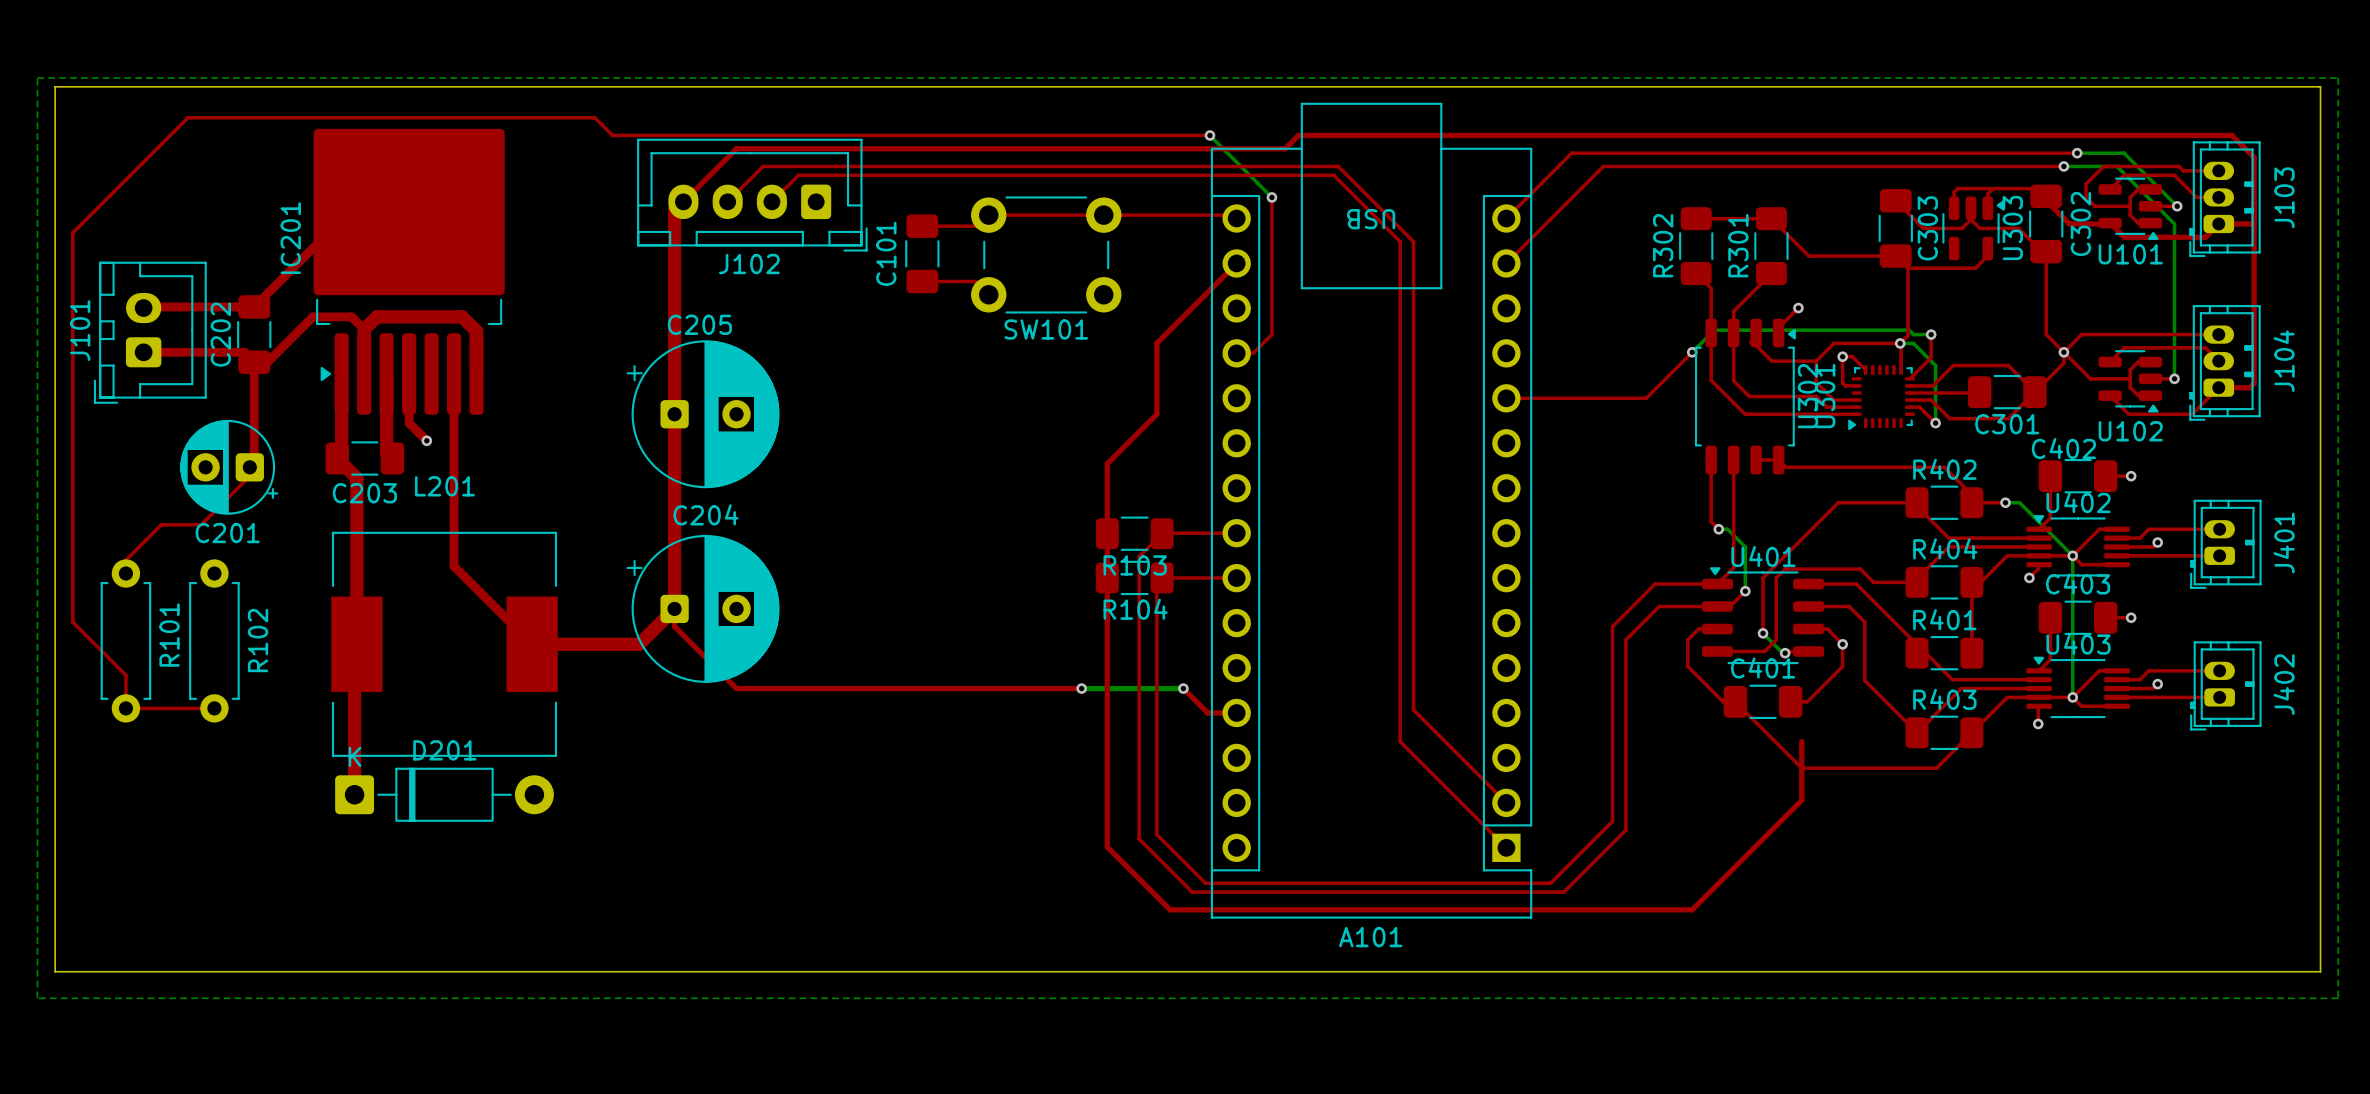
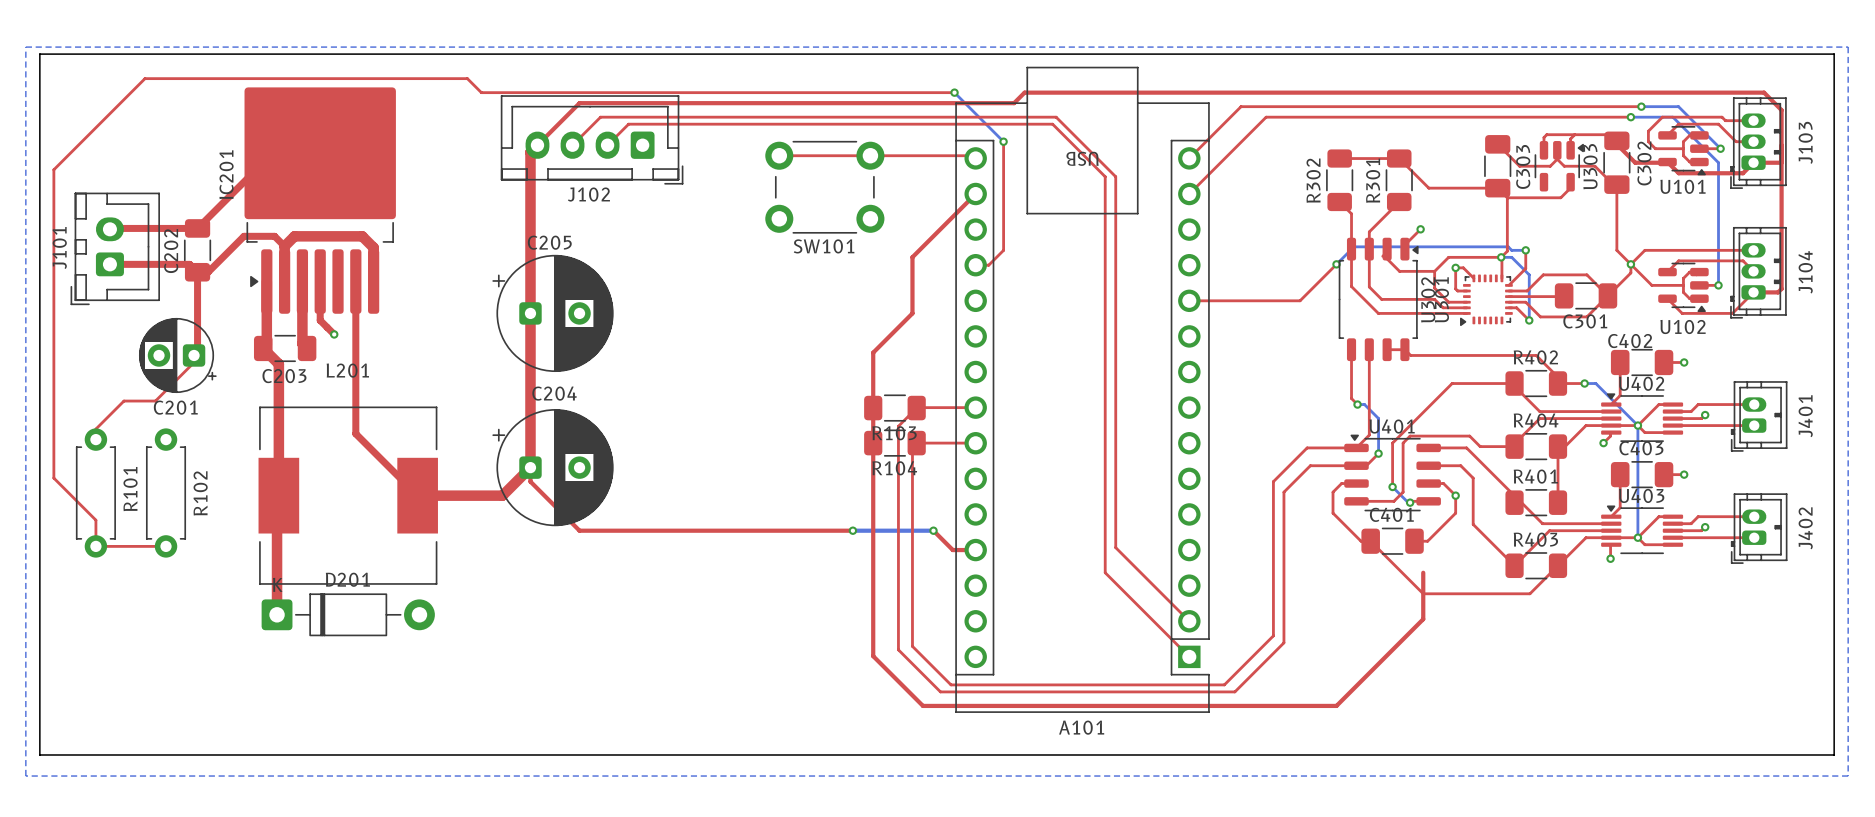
top track: (988, 215) (977, 226) (913, 226) -> none
C101: (922, 253) -> none
top track: (913, 281) (975, 281) (988, 294) -> none

